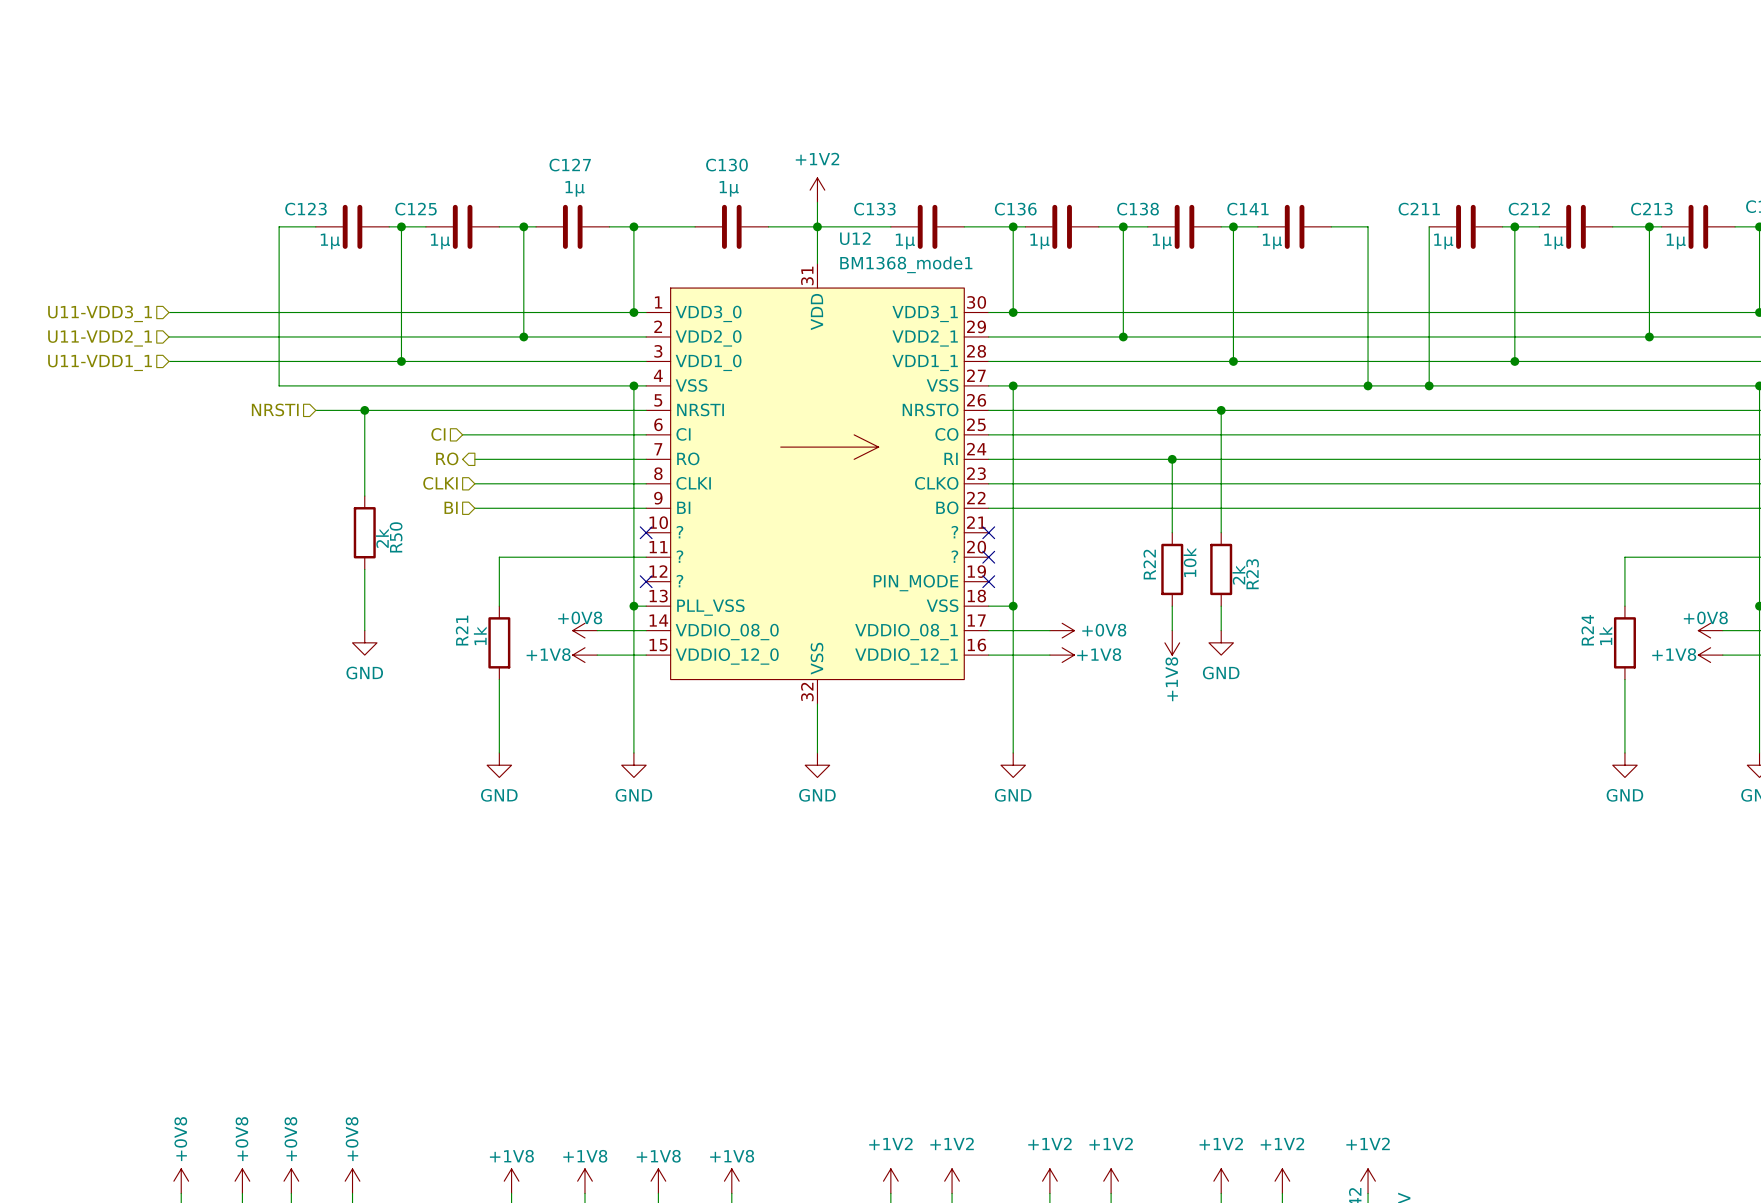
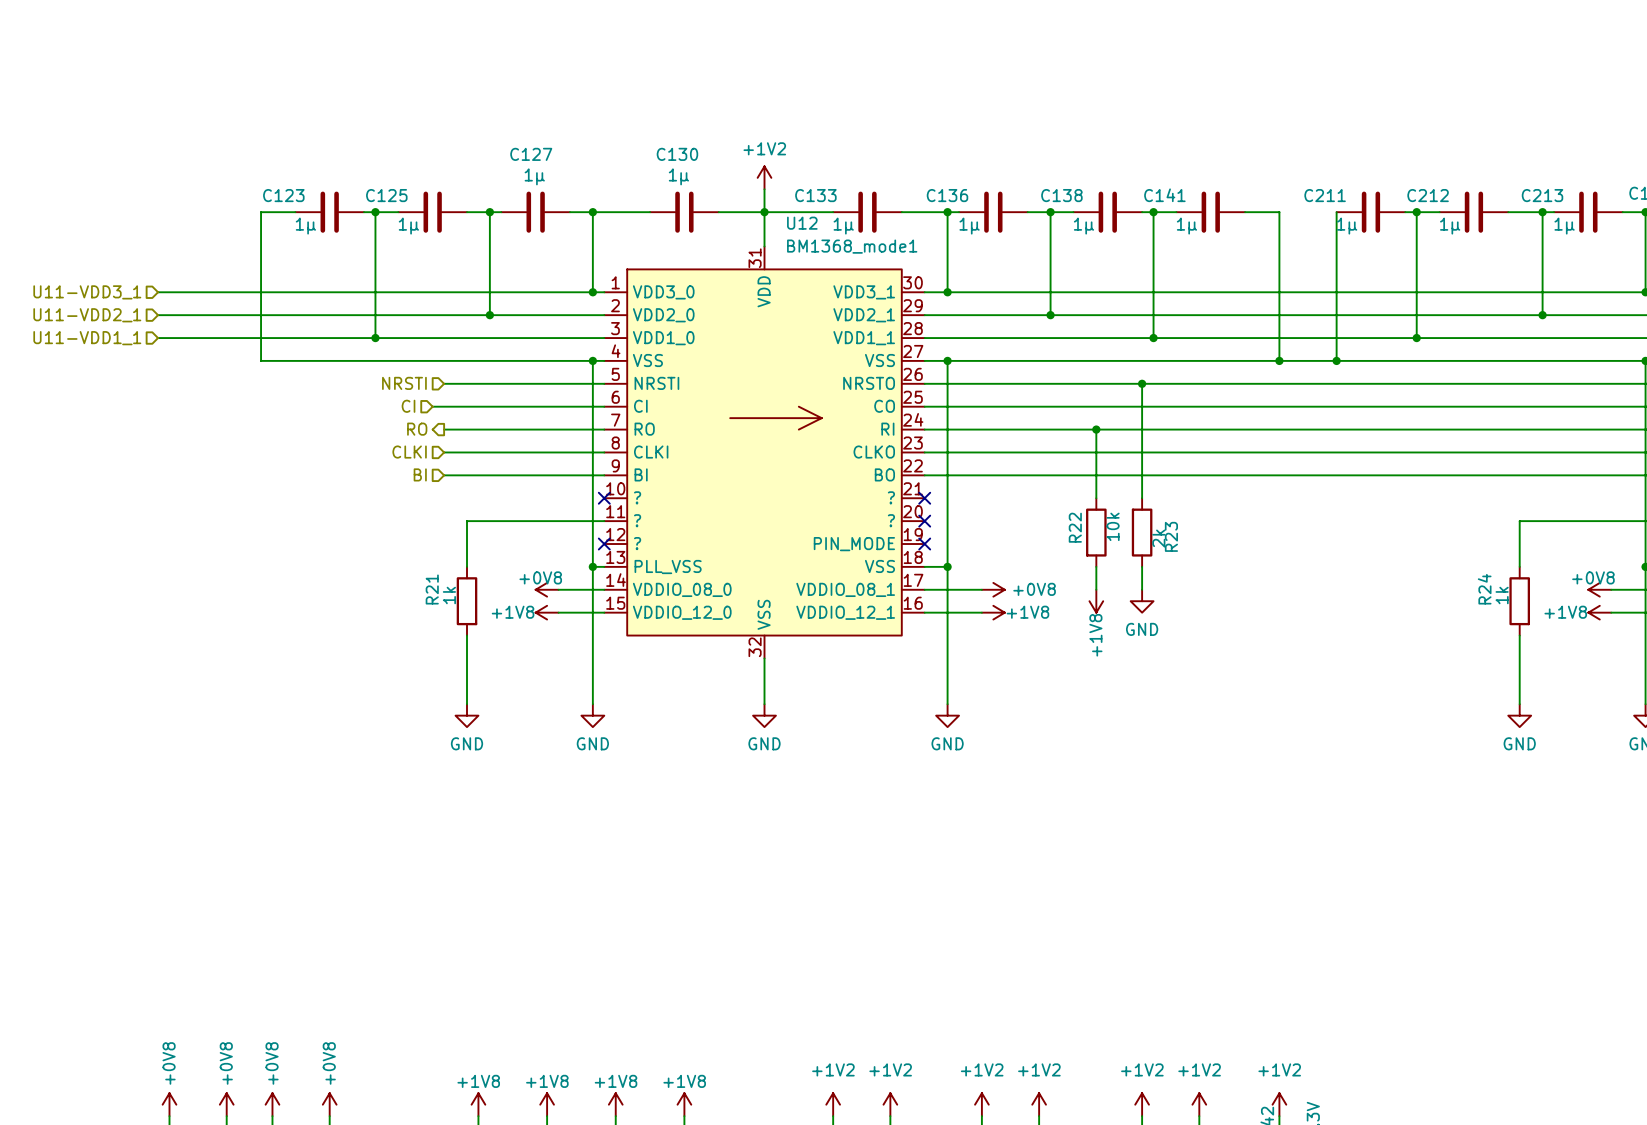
hierarchical label position: NRSTI (275, 409) -> NRSTI (404, 383)
wire: (315, 410) (474, 410) -> none
wire: (364, 410) (364, 496) -> none
junction: (364, 410) -> none
R50: 2k (364, 532) -> none
wire: (364, 569) (364, 630) -> none
power symbol: GND (364, 642) -> none

